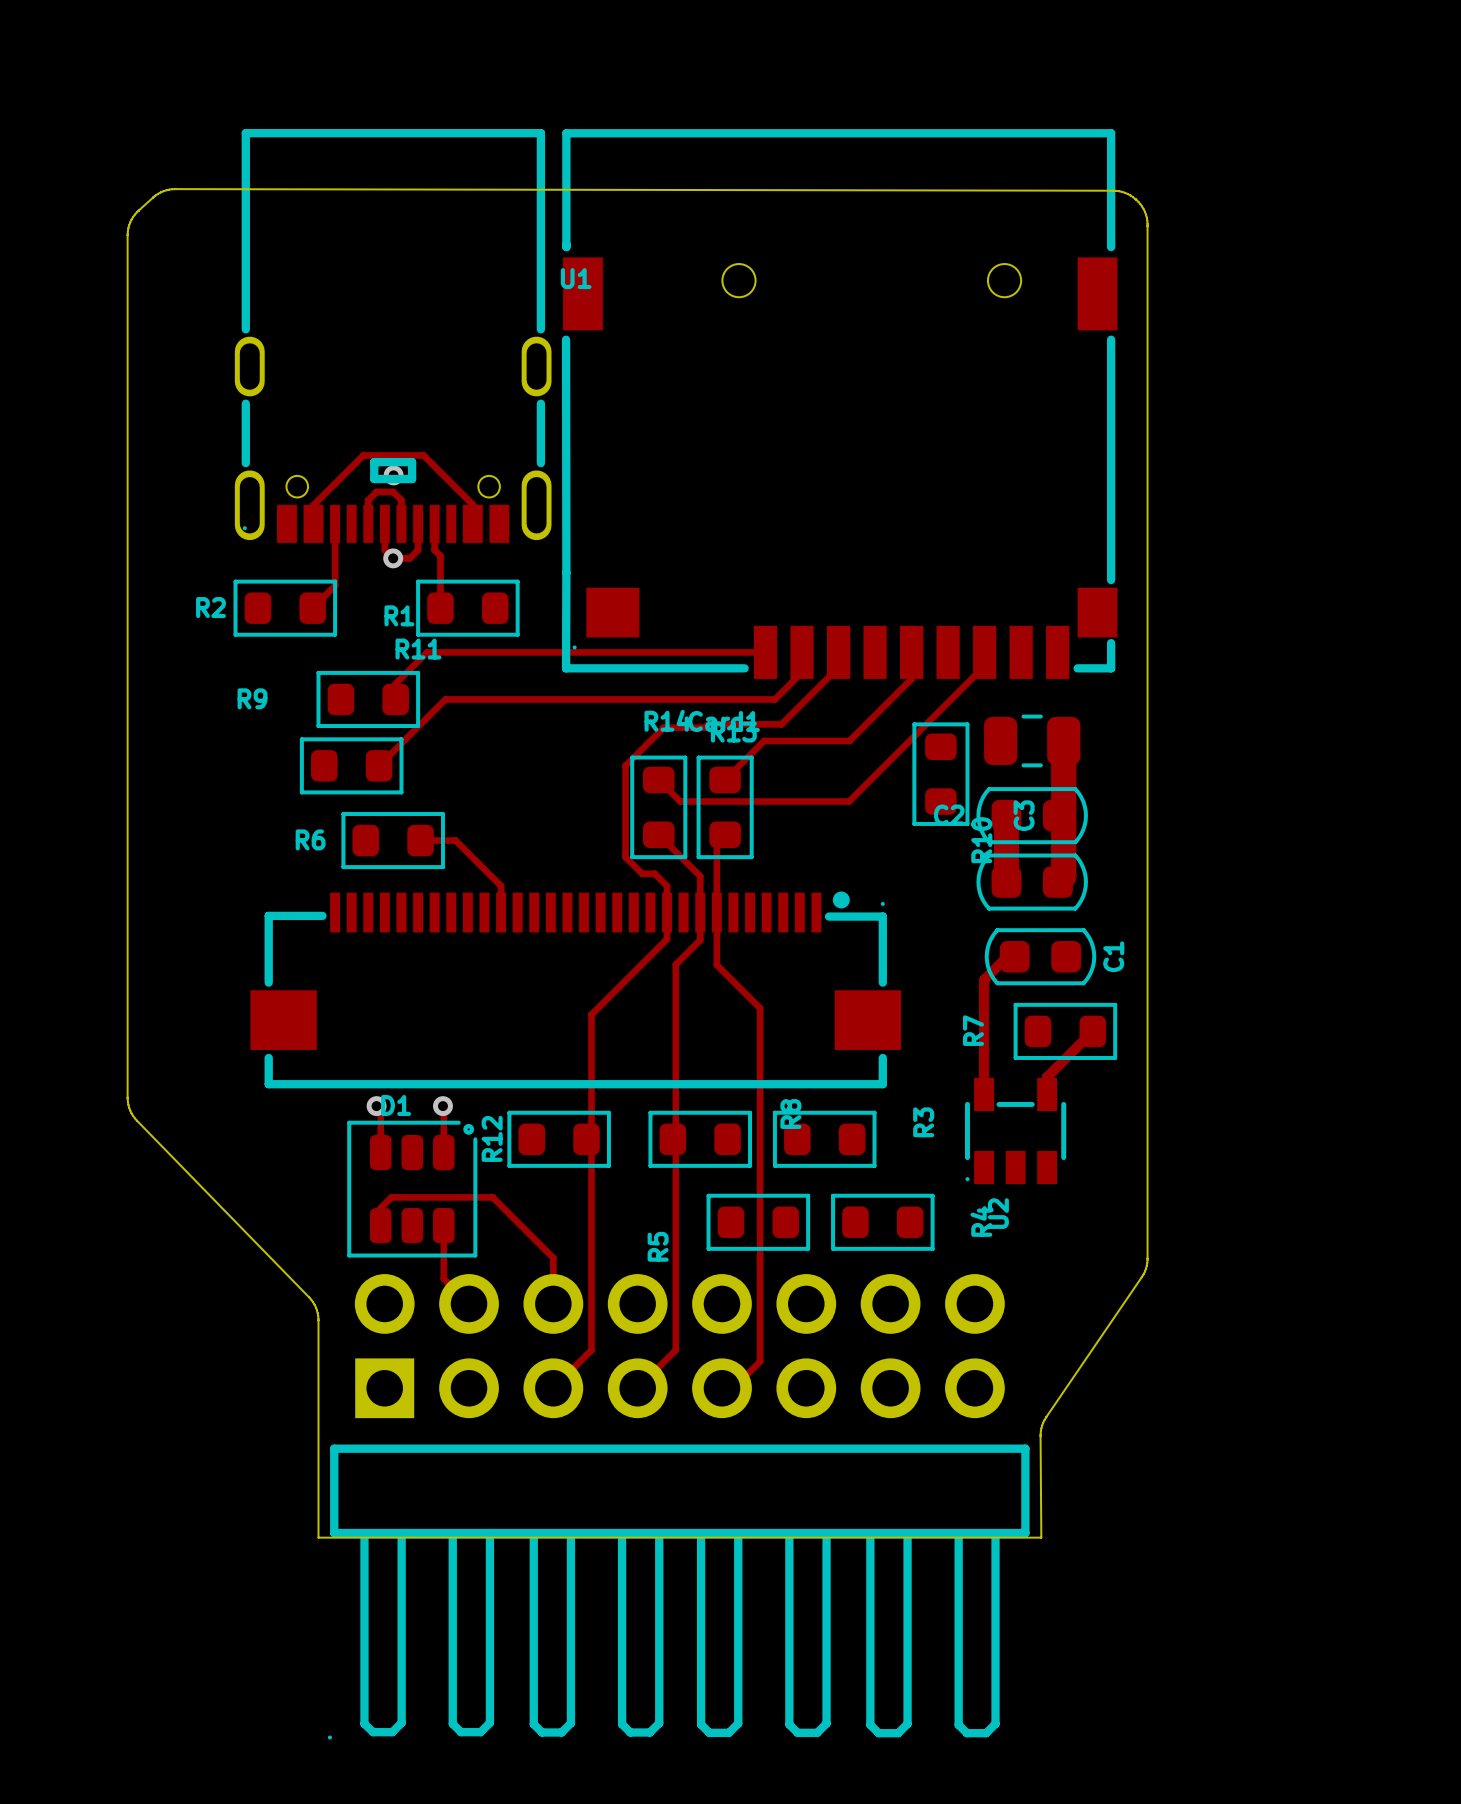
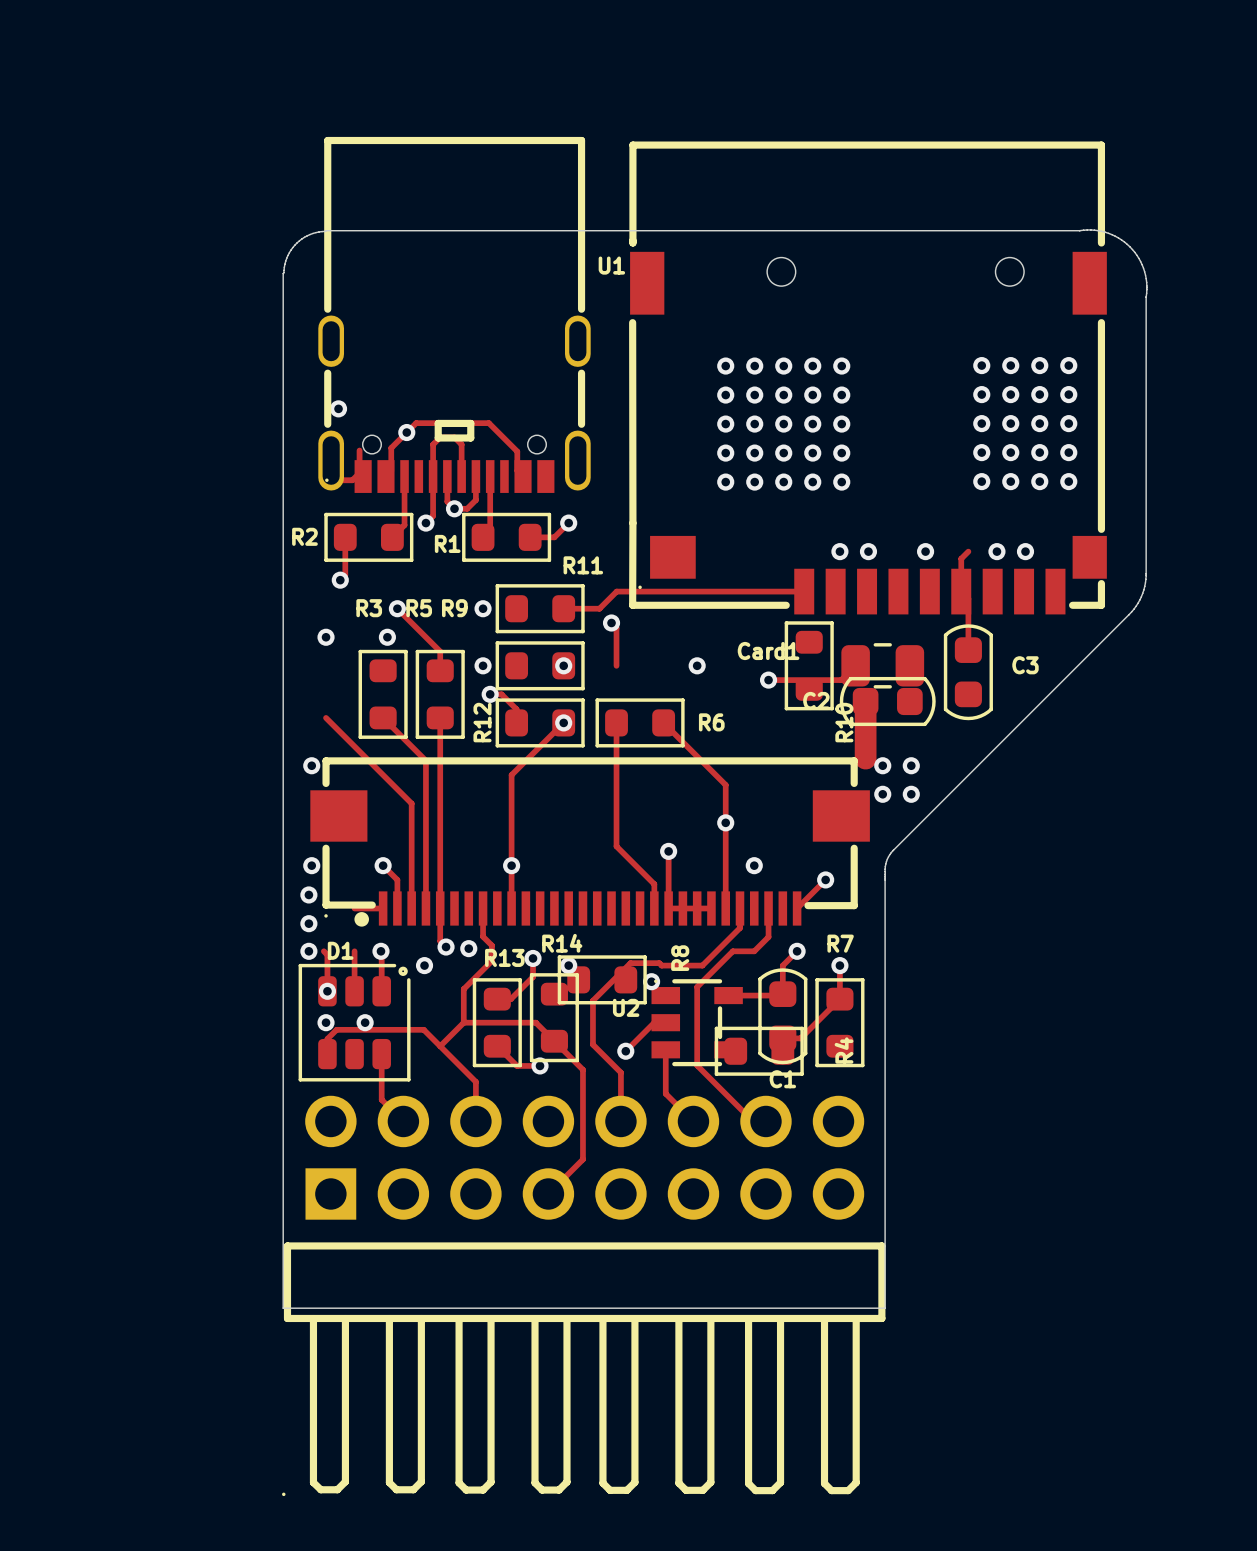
board edge: (175, 189) (163, 191) (153, 197) -> none
board edge: (175, 189) (1113, 190) -> none
board edge: (1113, 190) (1125, 192) (1135, 199) -> none
board edge: (152, 197) (139, 210) -> none
board edge: (1136, 199) (1144, 211) (1147, 224) (1147, 1258) (1142, 1276) -> none
board edge: (138, 210) (130, 222) (127, 233) (127, 1099) (130, 1110) (136, 1120) -> none
board edge: none -> (1079, 230) (326, 230) (307, 235) (292, 247) (286, 258) (283, 273) (283, 1308) (885, 1308) (886, 861) (892, 850) (1128, 614)
board edge: none -> (1080, 230) (1105, 232) (1118, 238) (1129, 246) (1138, 258) (1144, 271) (1146, 296)
U1 position: (393, 335) -> (454, 314)
board edge: none -> (1146, 297) (1146, 575) (1141, 596) (1129, 614)
Card1 position: (839, 404) -> (867, 377)
via: none -> (725, 366)
via: none -> (754, 366)
via: none -> (783, 366)
via: none -> (812, 366)
via: none -> (841, 366)
via: none -> (981, 365)
via: none -> (1010, 365)
via: none -> (1039, 365)
via: none -> (1068, 365)
via: none -> (981, 394)
via: none -> (1010, 394)
via: none -> (1039, 394)
via: none -> (1068, 394)
via: none -> (725, 395)
via: none -> (754, 395)
via: none -> (783, 395)
via: none -> (812, 395)
via: none -> (841, 395)
via: none -> (981, 423)
via: none -> (1010, 423)
via: none -> (1039, 423)
via: none -> (1068, 423)
via: none -> (725, 424)
via: none -> (754, 424)
via: none -> (783, 424)
via: none -> (812, 424)
via: none -> (841, 424)
via: none -> (406, 432)
track: (313, 523) (313, 505) (363, 455) (423, 455) (472, 504) (472, 523) -> none
track: (335, 523) (335, 585) (312, 608) -> none
track: (368, 523) (368, 500) (376, 491) (393, 491) (401, 500) (401, 523) -> none
track: (434, 523) (434, 550) (440, 555) (440, 608) -> none
via: none -> (725, 453)
via: none -> (754, 453)
via: none -> (783, 453)
via: none -> (812, 453)
via: none -> (841, 453)
via: none -> (981, 452)
via: none -> (1010, 452)
via: none -> (1039, 452)
via: none -> (1068, 452)
track: none -> (385, 476) (391, 471) (391, 448) (416, 423) (488, 423) (517, 451) (517, 470) (523, 476)
track: none -> (404, 476) (404, 525) (392, 537)
track: none -> (447, 476) (447, 501) (454, 508) (467, 508) (475, 500) (475, 476)
track: none -> (461, 476) (461, 444) (454, 437) (440, 437) (433, 444) (433, 515) (425, 523)
track: none -> (490, 476) (490, 530) (483, 537)
via: (393, 558) -> none
via: none -> (981, 481)
via: none -> (1010, 481)
via: none -> (1039, 481)
via: none -> (1068, 481)
via: none -> (725, 482)
via: none -> (754, 482)
via: none -> (783, 482)
via: none -> (812, 482)
via: none -> (841, 482)
via: none -> (454, 508)
R2 position: (285, 608) -> (368, 537)
R1 position: (467, 608) -> (506, 537)
via: none -> (425, 523)
track: none -> (568, 523) (554, 537) (530, 537)
via: none -> (568, 523)
track: none -> (345, 537) (345, 575) (340, 580)
via: none -> (839, 551)
via: none -> (868, 551)
via: none -> (925, 551)
track: none -> (968, 551) (961, 558) (961, 591) (968, 598) (968, 650)
via: none -> (996, 551)
via: none -> (1025, 551)
track: (765, 652) (426, 652) (395, 683) (395, 699) -> none
track: (802, 652) (802, 672) (774, 699) (445, 699) (379, 765) -> none
track: (838, 652) (838, 667) (781, 724) (708, 724) (705, 727) (663, 727) (625, 765) (625, 857) (642, 873) (654, 873) (667, 886) (667, 939) (591, 1014) (591, 1350) (553, 1388) -> none
track: (911, 652) (911, 678) (849, 740) (764, 740) (725, 779) -> none
track: (984, 652) (984, 665) (849, 801) (680, 801) (658, 779) -> none
via: none -> (340, 580)
track: none -> (804, 591) (616, 591) (599, 608) (563, 608)
R11 position: (368, 699) -> (540, 608)
track: none -> (397, 608) (440, 651) (440, 670)
via: none -> (397, 608)
via: none -> (483, 608)
track: none -> (611, 622) (616, 627) (616, 665)
via: none -> (611, 622)
via: none -> (326, 637)
via: none -> (387, 637)
part position: (1032, 740) -> (882, 665)
track: (1063, 740) (1063, 876) (1057, 882) -> none
R9 position: (351, 765) -> (540, 665)
via: none -> (483, 665)
via: none -> (563, 665)
via: none -> (697, 665)
track: none -> (855, 665) (841, 680) (768, 680)
via: none -> (768, 680)
track: none -> (490, 694) (501, 694) (516, 709) (516, 722)
via: none -> (490, 694)
R14 position: (658, 807) -> (554, 1017)
R13 position: (725, 807) -> (497, 1022)
track: none -> (326, 717) (411, 803) (411, 908)
track: none -> (383, 717) (425, 760) (425, 908)
track: none -> (440, 717) (440, 941) (446, 947)
track: (658, 834) (700, 876) (700, 940) (675, 964) (675, 1350) -> (463, 1022) (535, 1022) (582, 1069) (582, 1159) (581, 1161)
R6 name position: R6 (310, 839) -> R6 (711, 722)
R6 position: (393, 840) -> (640, 722)
track: (420, 840) (455, 840) (501, 886) (501, 912) -> none
track: none -> (563, 722) (511, 775) (511, 908)
via: none -> (563, 722)
track: none -> (663, 722) (725, 785) (725, 908)
C3 rotation: 0° (1032, 882) -> 90° clockwise (968, 672)
C3 position: (1032, 882) -> (968, 672)
via: none -> (311, 765)
via: none -> (882, 765)
via: none -> (911, 765)
via: none -> (882, 794)
via: none -> (911, 794)
via: none -> (725, 822)
track: (1014, 956) (1007, 956) (984, 979) (984, 1094) -> none
C1 rotation: 0° (1040, 956) -> 90° clockwise (782, 1016)
C1 position: (1040, 956) -> (782, 1016)
track: (716, 965) (760, 1008) (760, 1361) (733, 1388) (721, 1388) -> (616, 829) (616, 846) (654, 884) (654, 908)
part rotation: 0° (575, 989) -> 180° (590, 841)
track: none -> (668, 851) (668, 908) (711, 908)
via: none -> (668, 851)
via: none -> (311, 865)
track: none -> (383, 865) (397, 879) (397, 908)
via: none -> (383, 865)
via: none -> (511, 865)
via: none -> (754, 865)
track: none -> (825, 879) (797, 908)
via: none -> (825, 879)
R7 rotation: 0° (1065, 1031) -> 90° clockwise (839, 1022)
R7 position: (1065, 1031) -> (839, 1022)
track: (1092, 1031) (1047, 1077) (1047, 1094) -> none
via: none -> (308, 894)
track: none -> (354, 908) (383, 908)
track: none -> (483, 908) (483, 936) (491, 945) (491, 960) (463, 989) (463, 1022)
track: none -> (740, 908) (740, 928) (702, 965) (630, 963) (592, 1000) (592, 1044) (620, 1072) (620, 1121)
track: none -> (768, 908) (768, 937) (754, 951) (732, 951) (697, 987) (697, 1065) (753, 1121) (765, 1121)
via: none -> (308, 923)
via: none -> (446, 947)
via: none -> (468, 948)
via position: (376, 1106) -> (308, 951)
track: none -> (354, 951) (354, 991)
track: none -> (797, 951) (782, 965) (781, 995) (728, 995)
via: none -> (797, 951)
track: none -> (533, 958) (533, 977) (510, 999) (497, 999)
via: none -> (533, 958)
board edge: (137, 1120) (308, 1297) -> none
via: none -> (424, 965)
via: none -> (568, 965)
R3 name position: R3 (923, 1122) -> R3 (369, 608)
track: none -> (839, 965) (839, 999) (800, 1038) (782, 1038)
via: none -> (839, 965)
U2 rotation: 0° (1015, 1131) -> 90° clockwise (697, 1022)
U2 position: (1015, 1131) -> (697, 1022)
R12 position: (559, 1139) -> (540, 722)
R3 rotation: 0° (824, 1139) -> 90° clockwise (383, 694)
R3 position: (824, 1139) -> (383, 694)
via: none -> (651, 981)
via: none -> (327, 991)
via: none -> (326, 1022)
via: none -> (365, 1022)
track: none -> (463, 1022) (440, 1046)
track: none -> (665, 1022) (654, 1022) (625, 1051)
track: none -> (497, 1046) (517, 1065) (540, 1065)
track: none -> (665, 1049) (665, 1093) (693, 1121)
via: none -> (625, 1051)
R5 rotation: 0° (758, 1222) -> 90° clockwise (440, 694)
R5 position: (758, 1222) -> (440, 694)
via: none -> (540, 1065)
board edge: (1141, 1277) (1046, 1417) -> none
board edge: (309, 1297) (315, 1307) (318, 1318) (318, 1537) (1041, 1537) (1040, 1434) (1046, 1417) -> none

